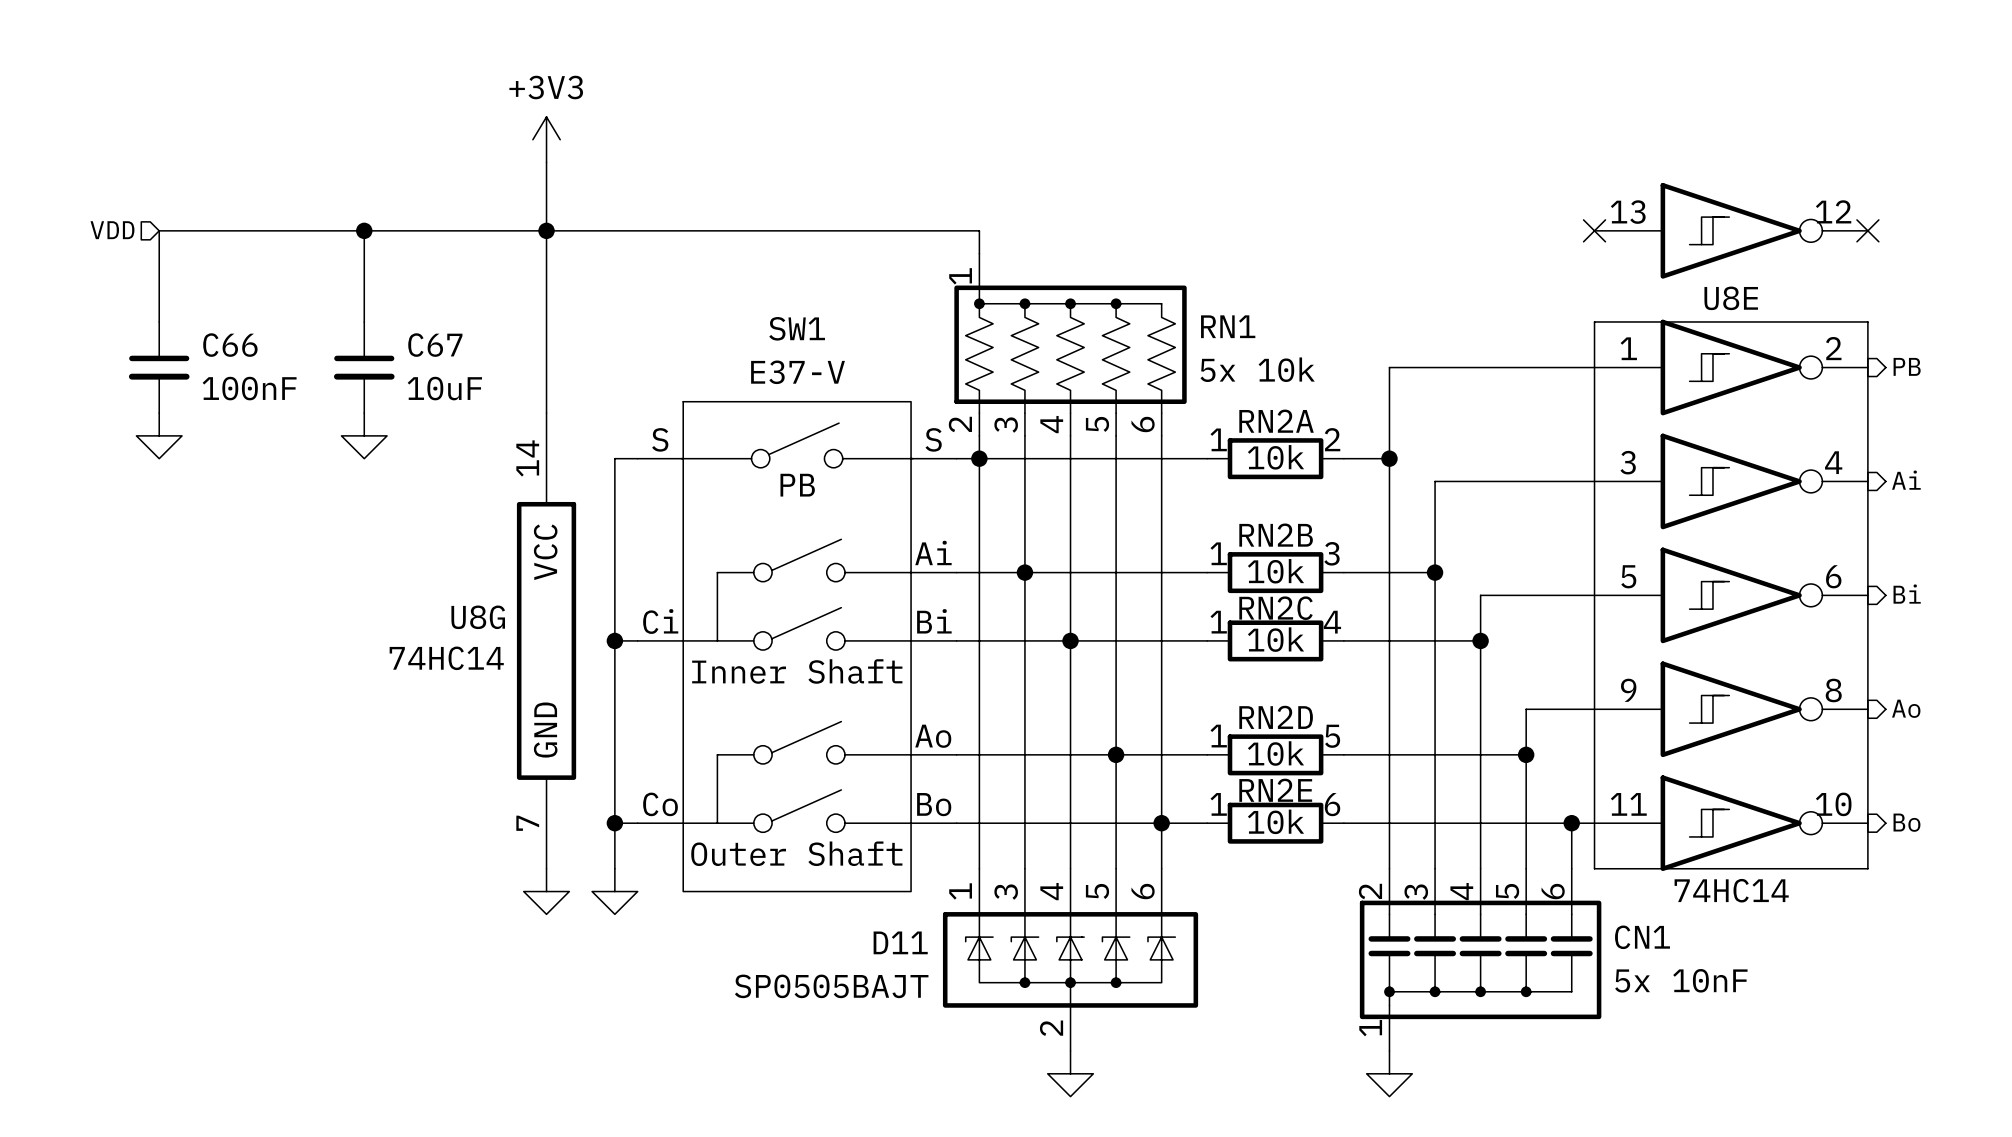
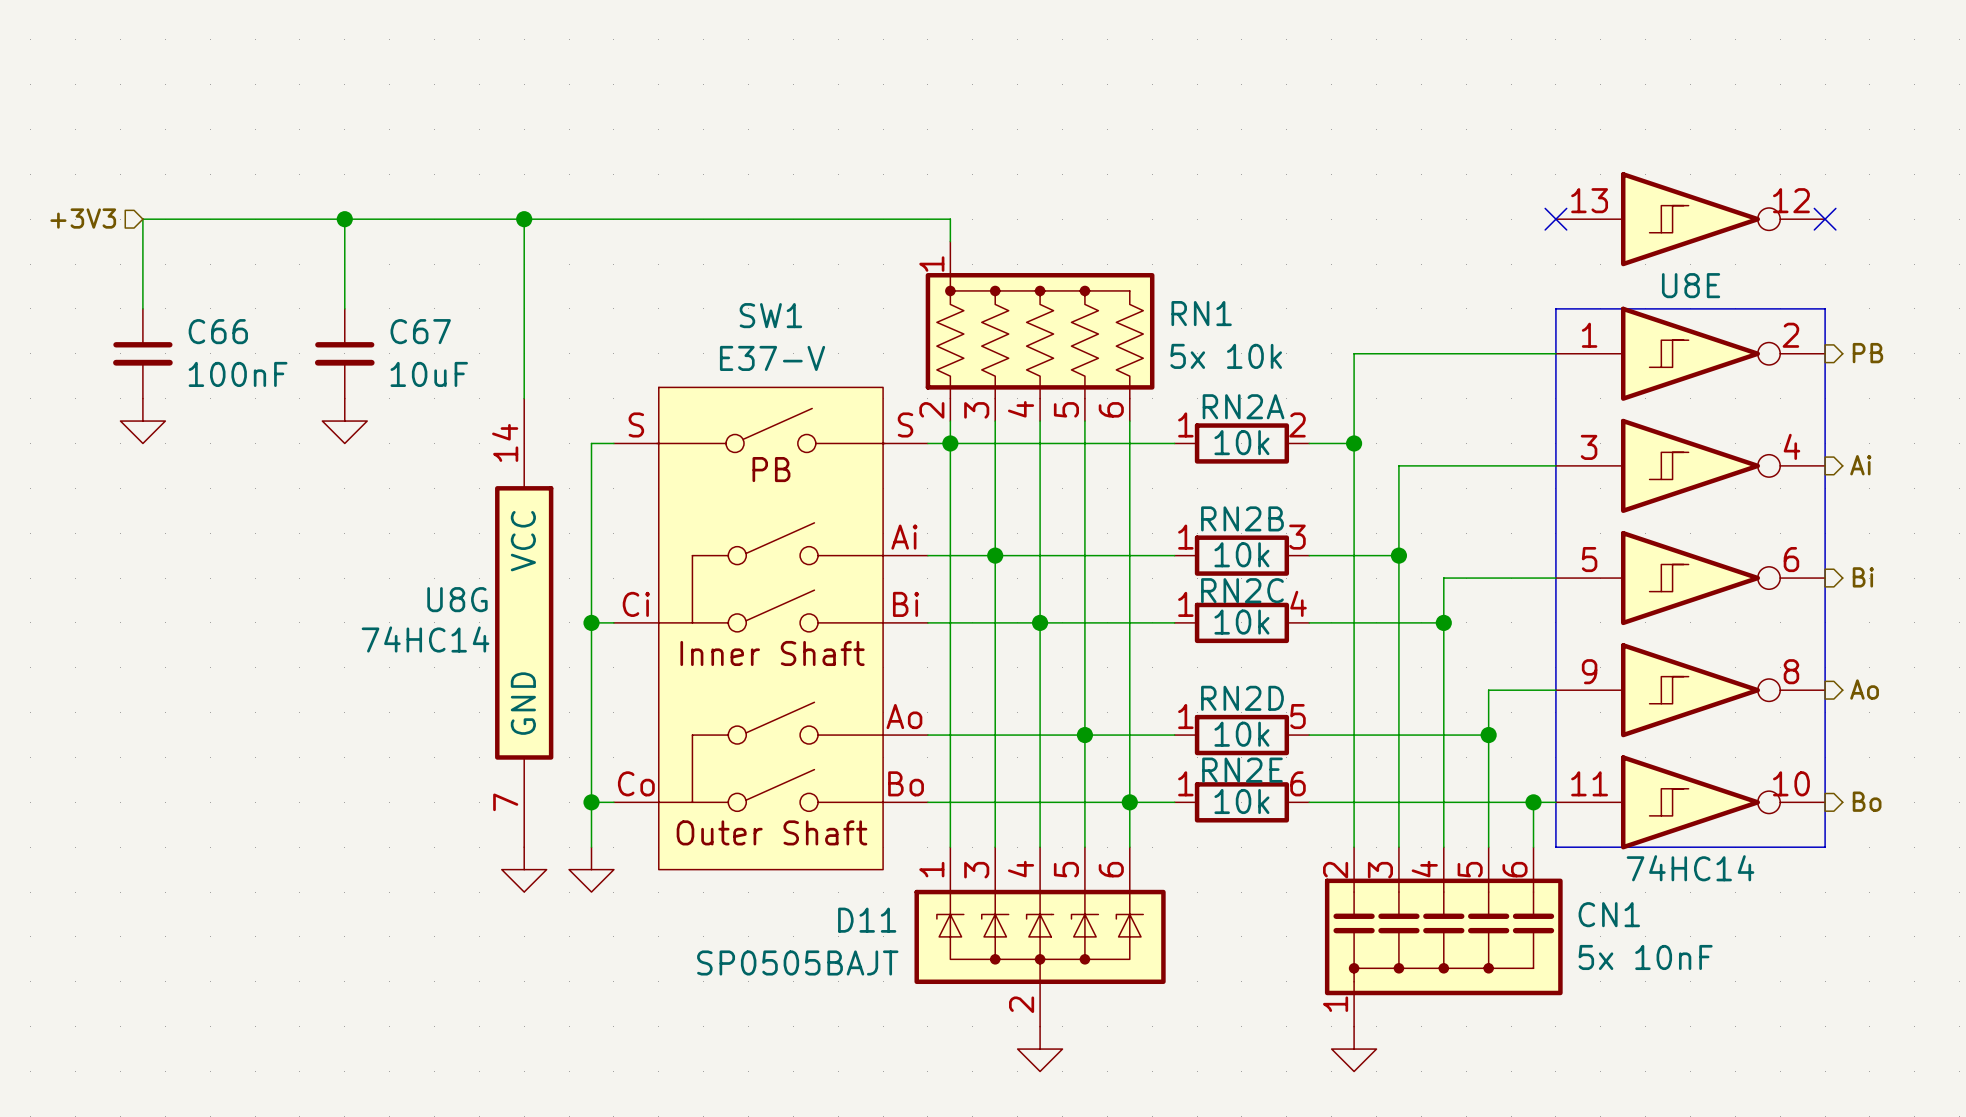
power symbol: +3V3 (546, 139) -> none
wire: (546, 162) (546, 230) -> none
hierarchical label: VDD (112, 230) -> +3V3 (83, 218)

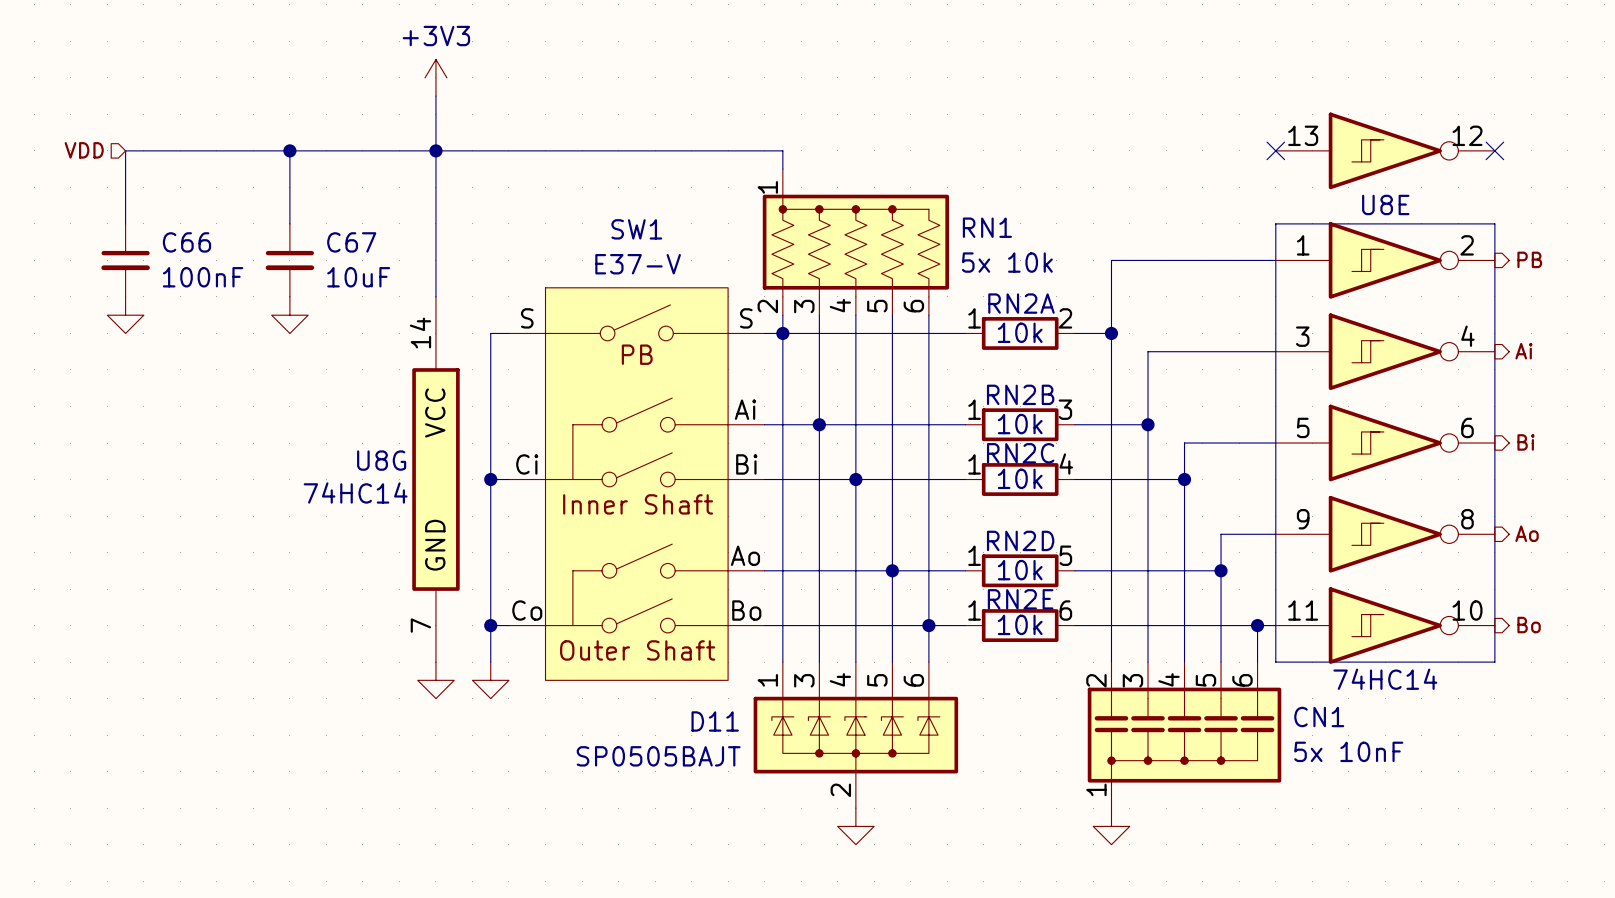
power symbol: none -> +3V3 (435, 77)
wire: none -> (435, 96) (435, 150)
hierarchical label: +3V3 (83, 218) -> VDD (84, 150)

